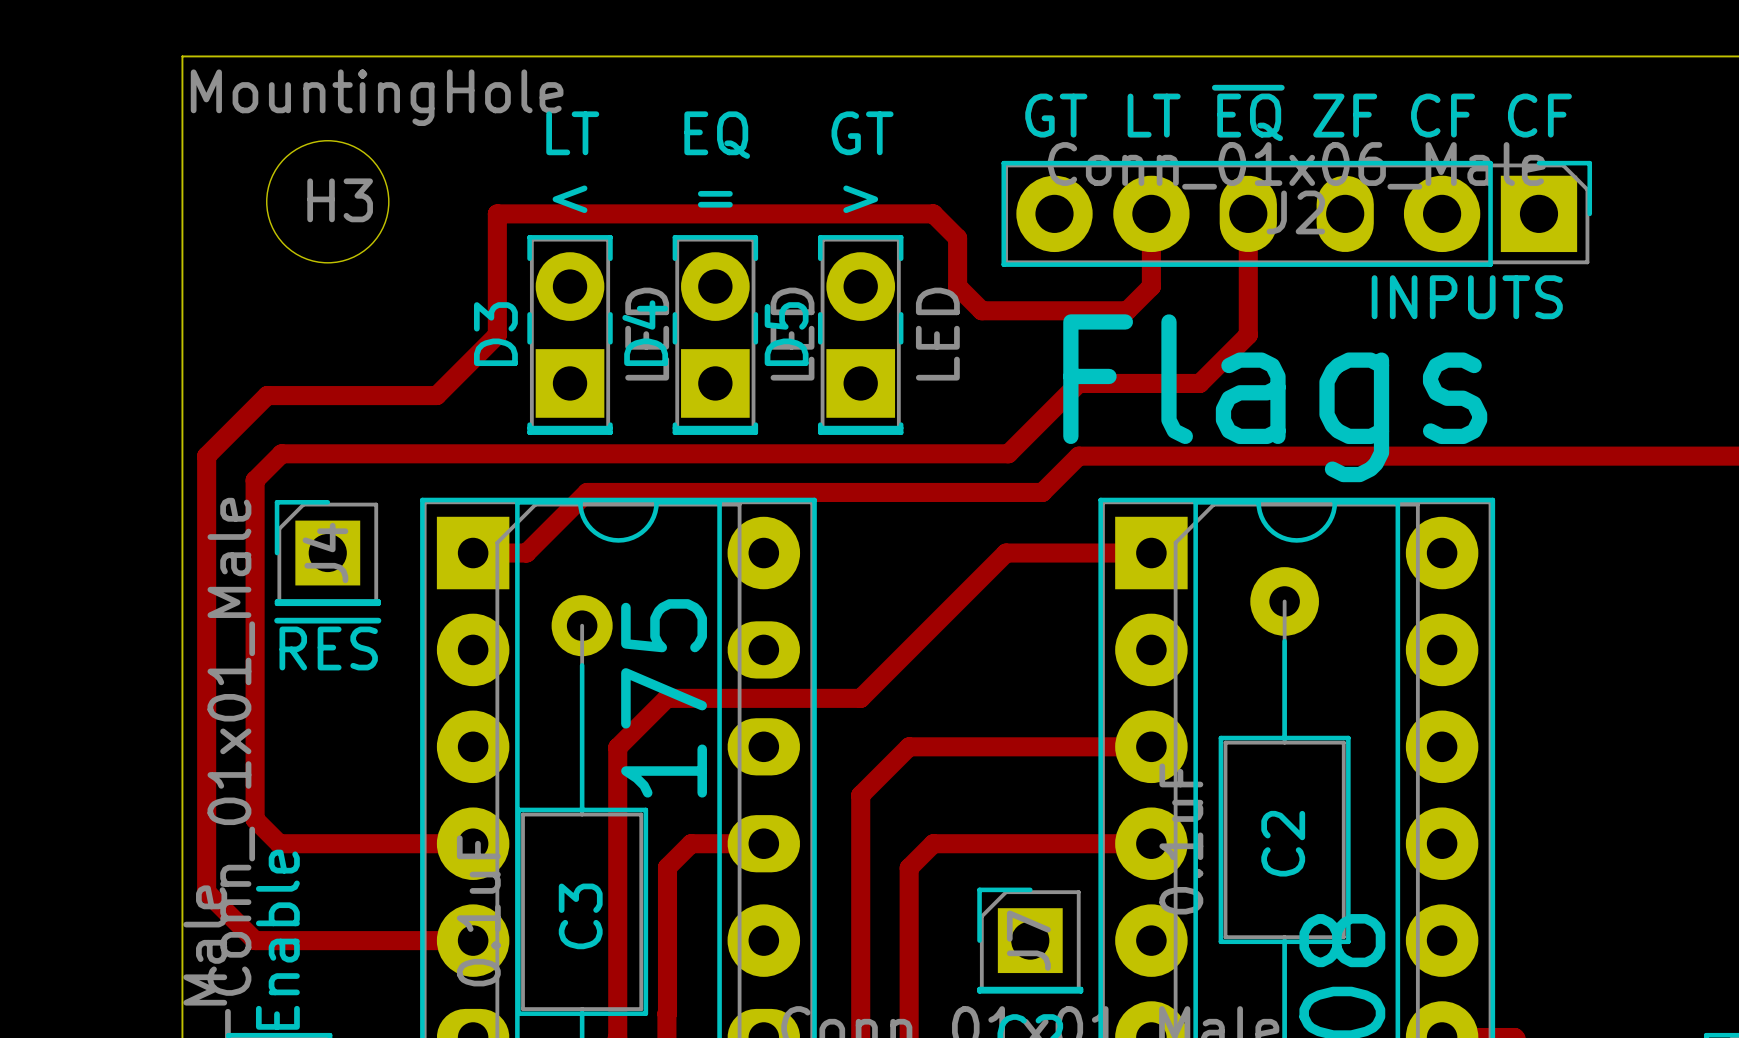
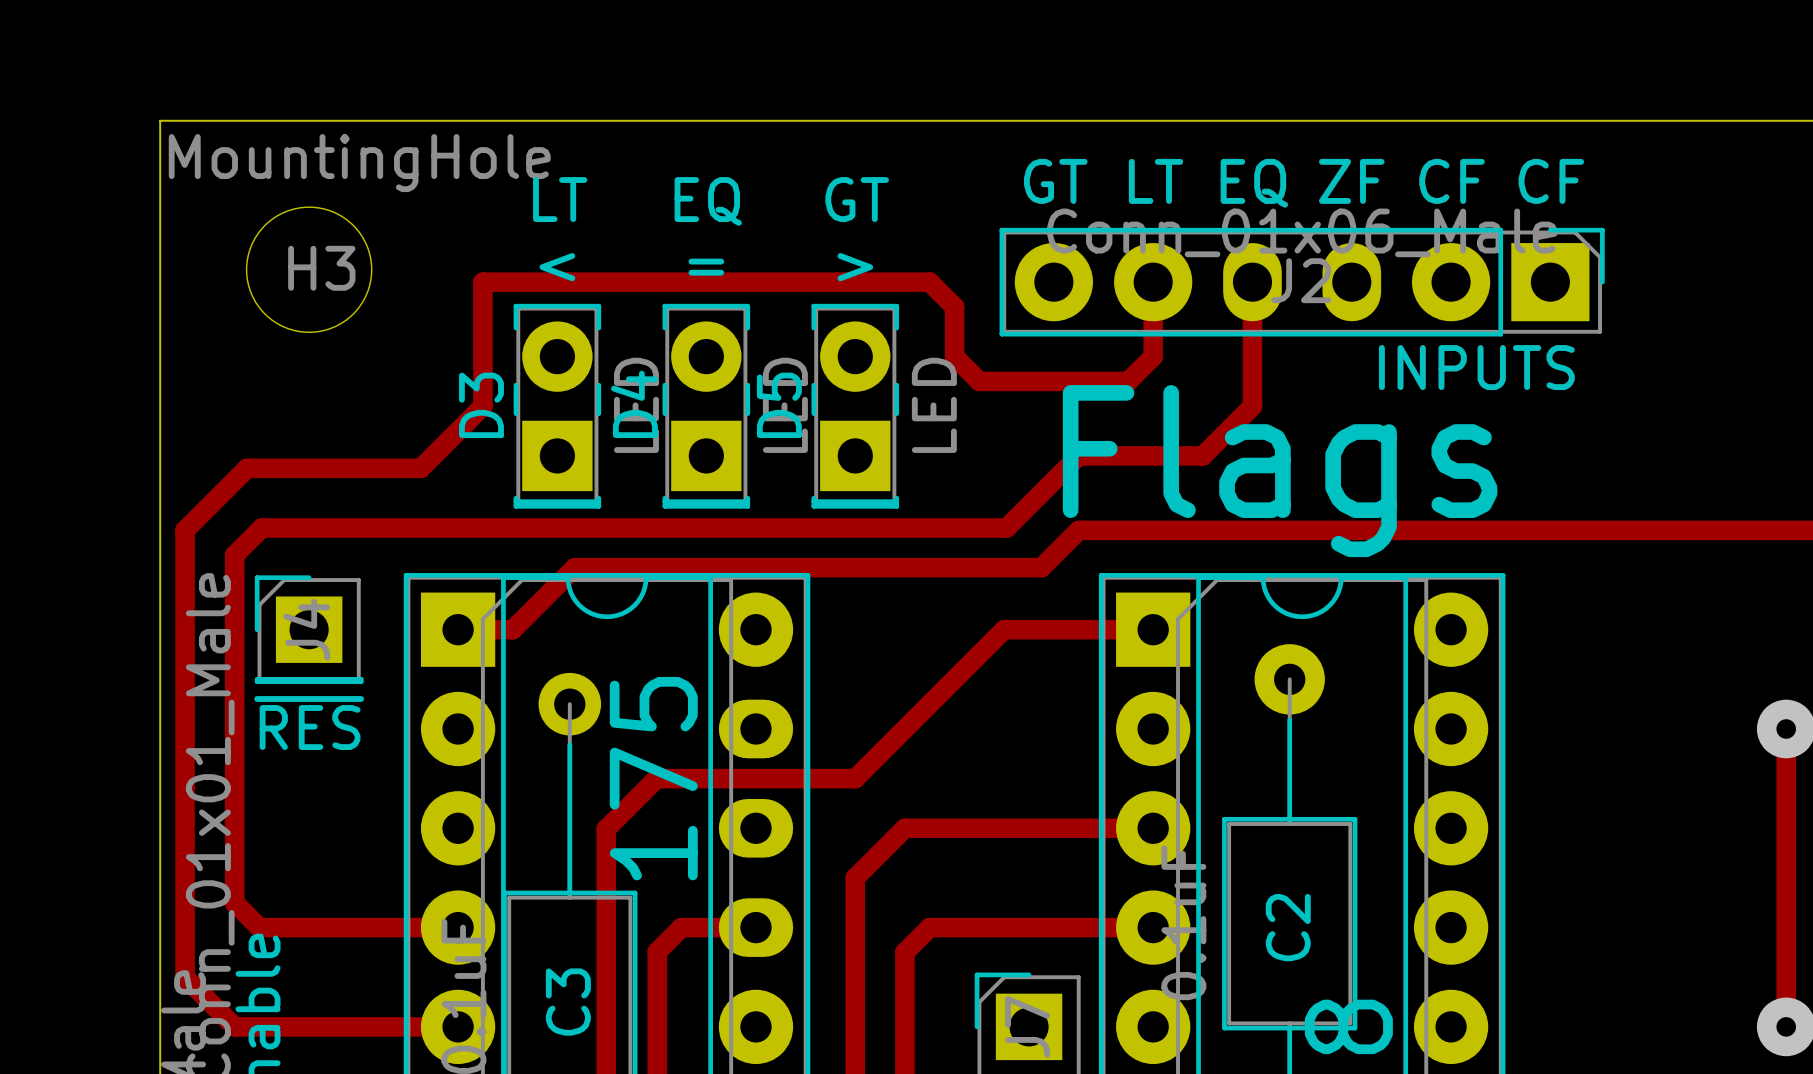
text: ~{EQ} (1248, 112) -> none

